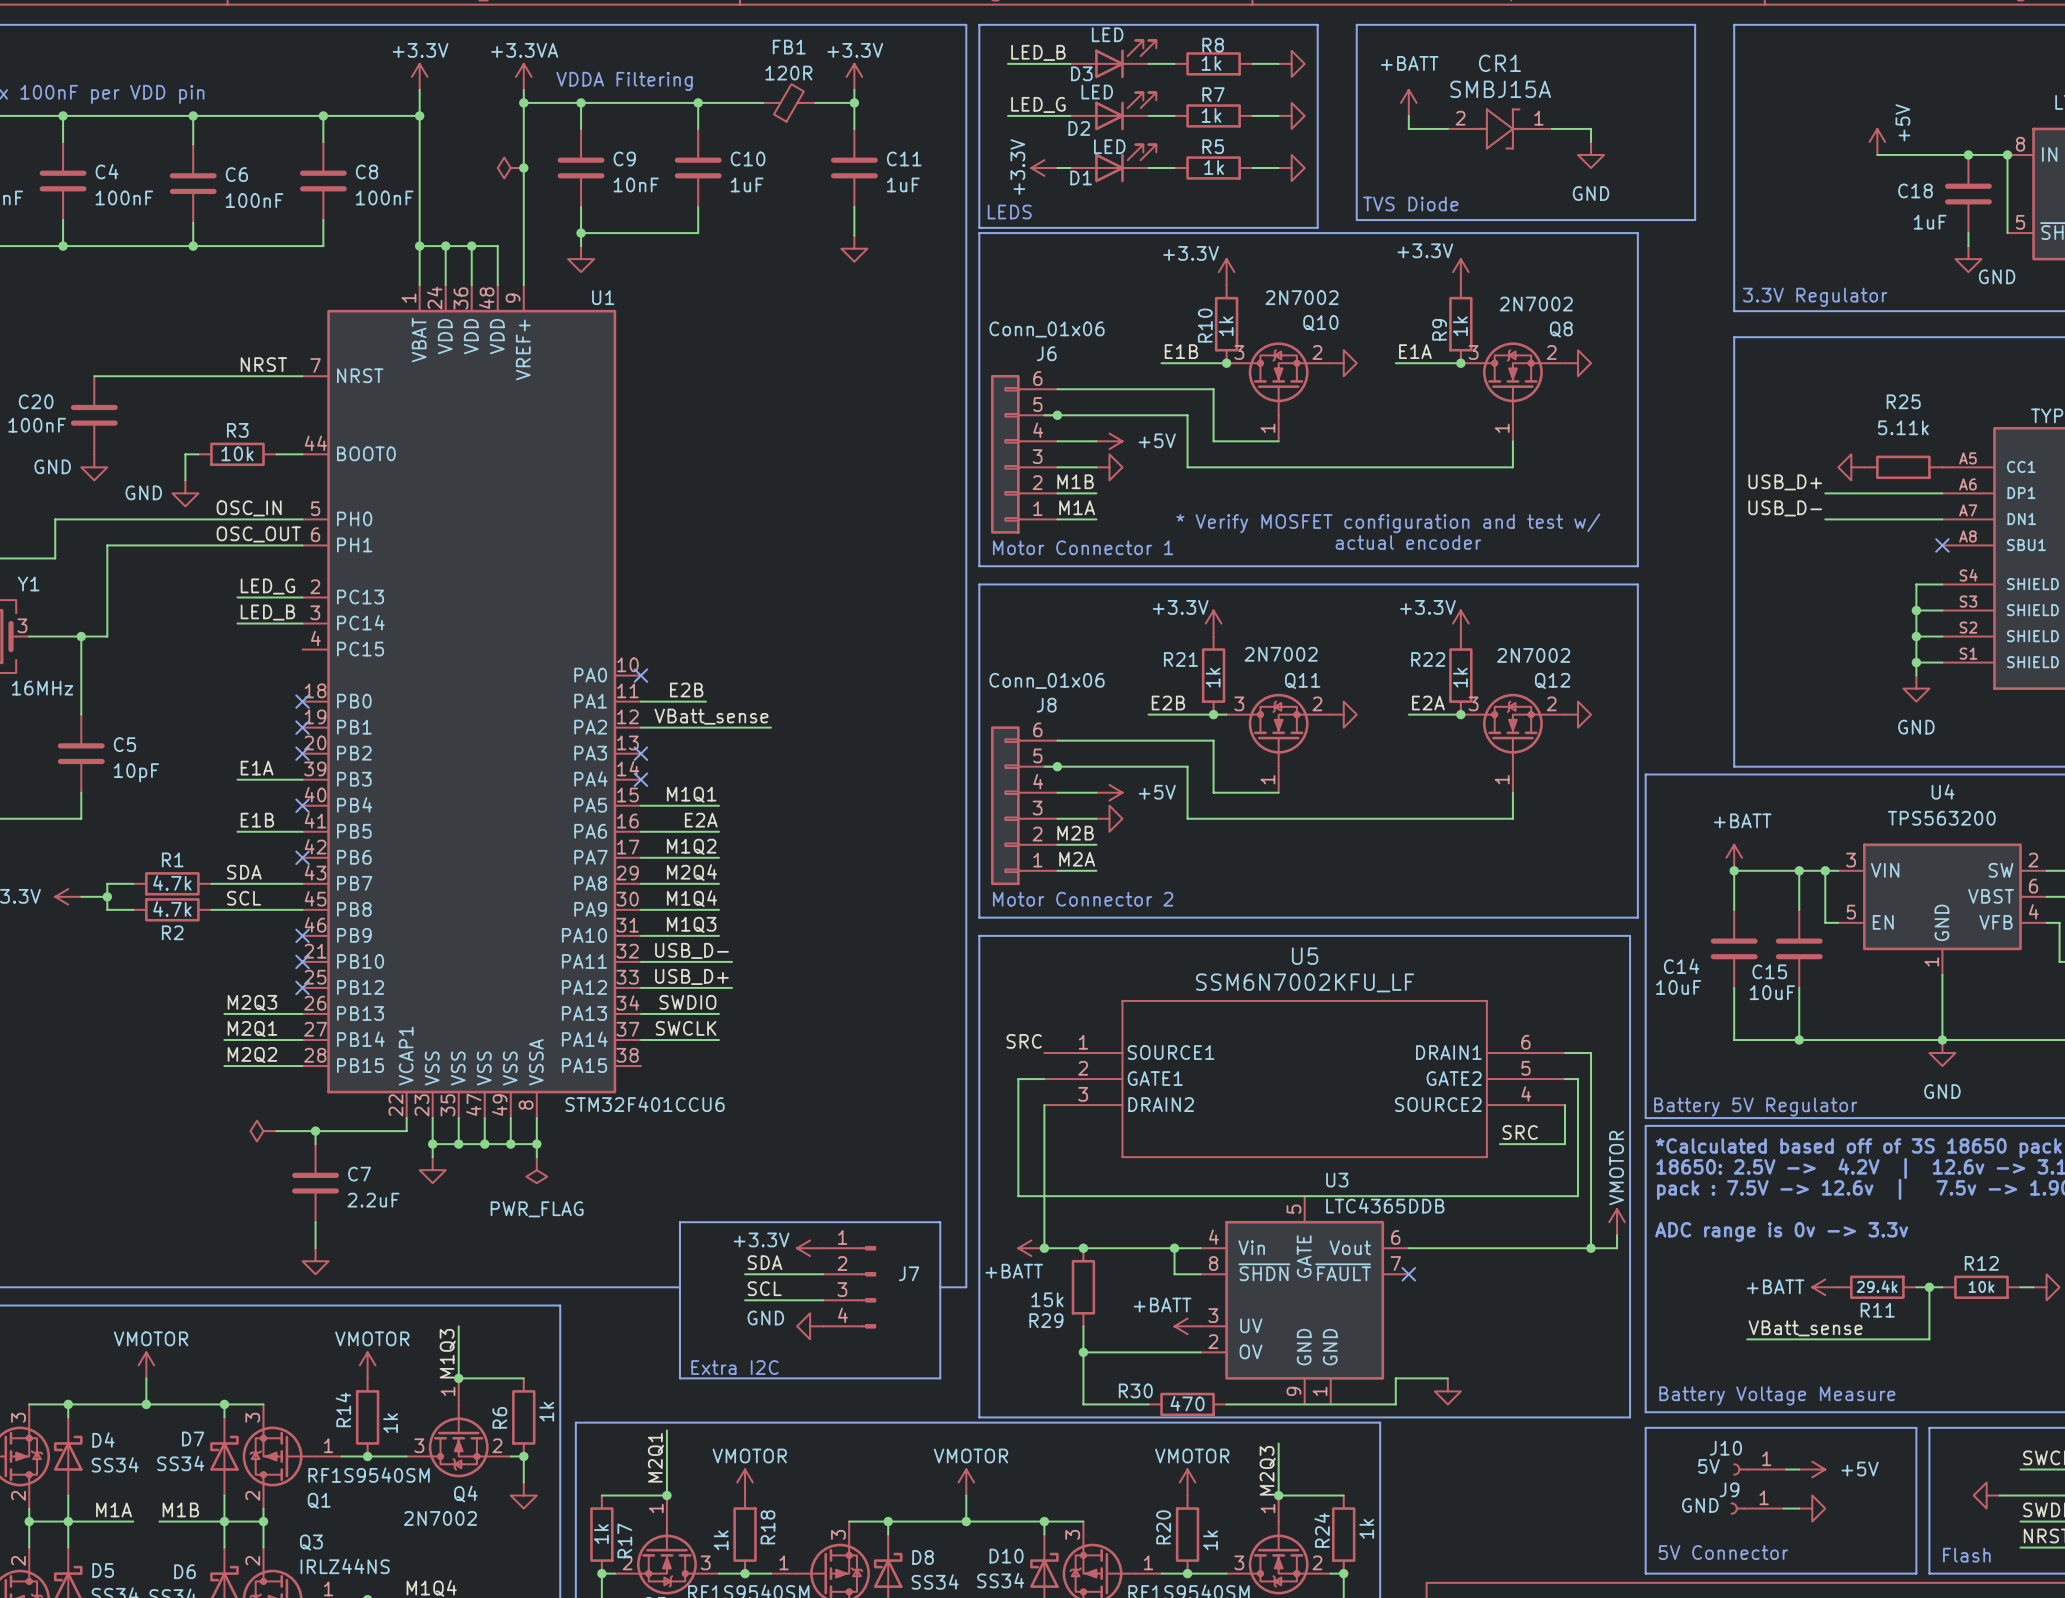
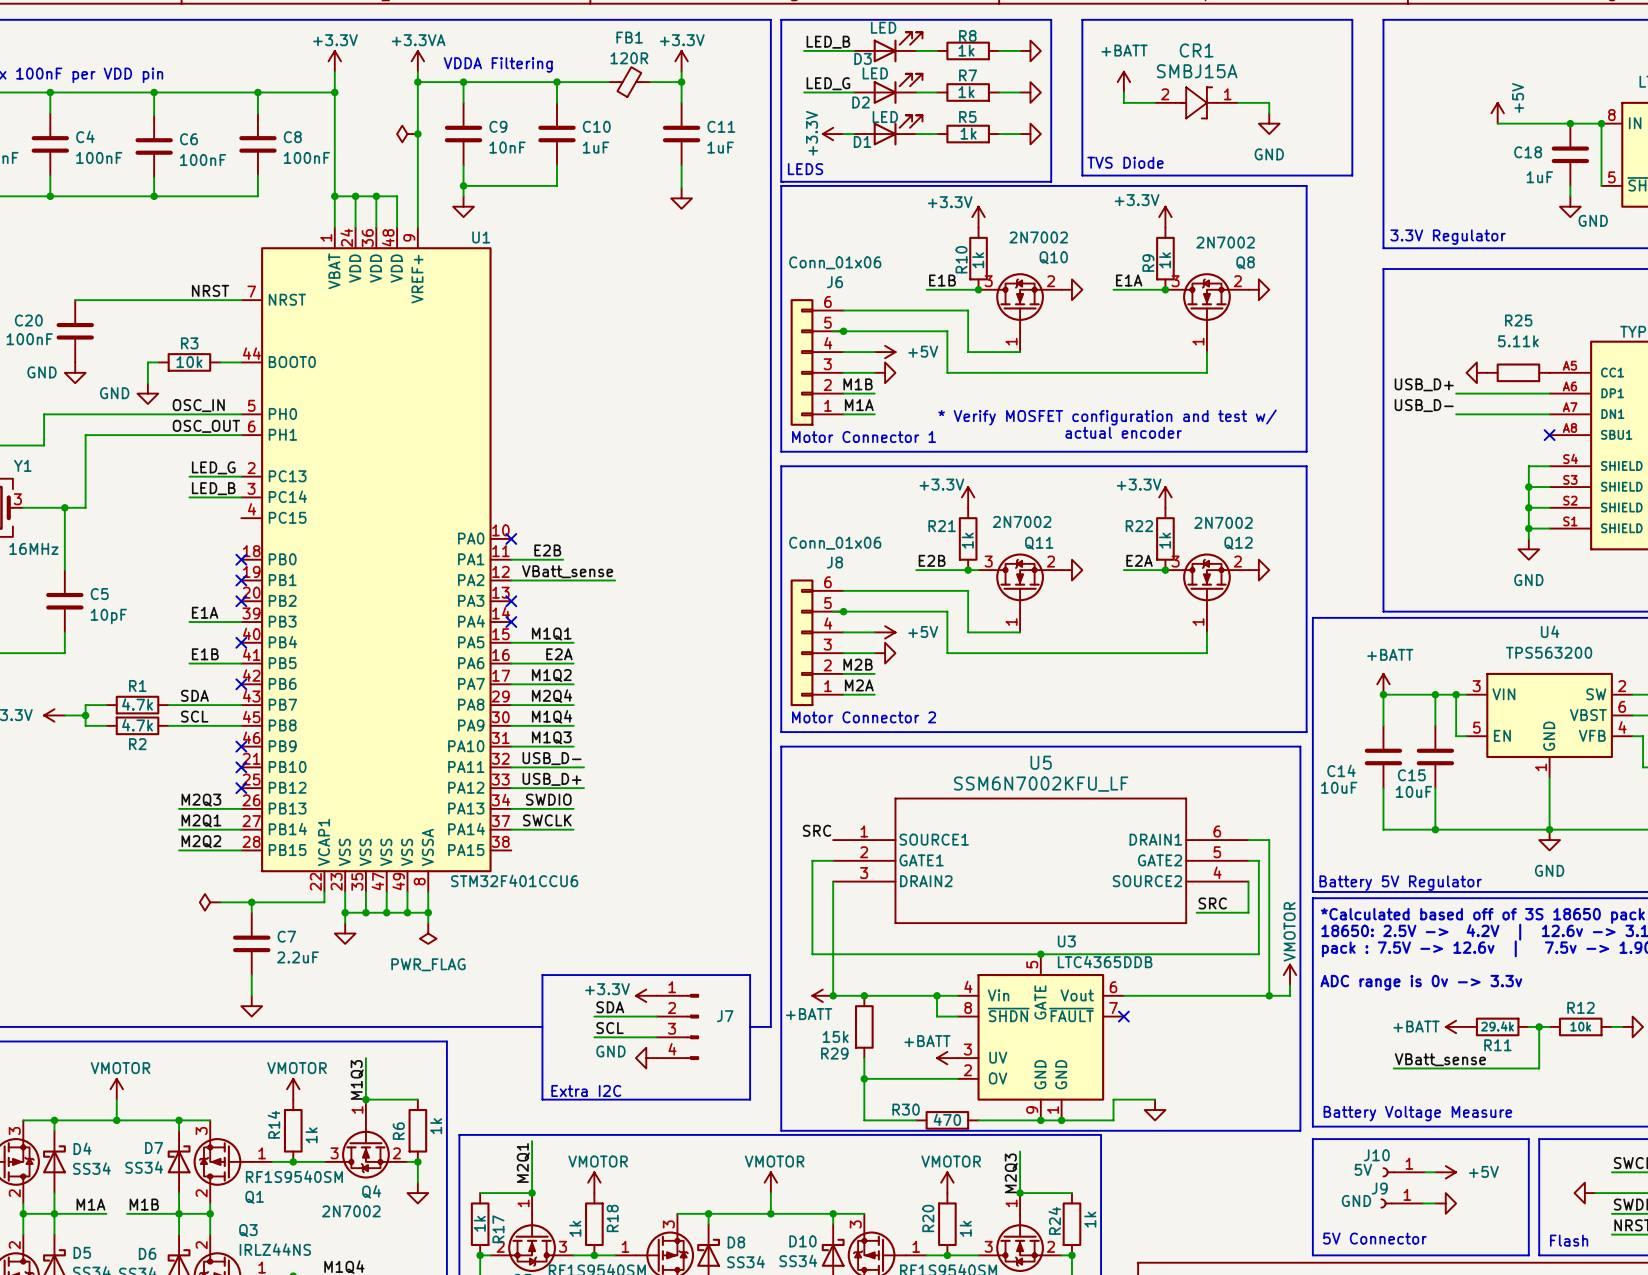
junction: none -> (1040, 954)
junction: none -> (1040, 1120)
junction: none -> (1061, 1120)

